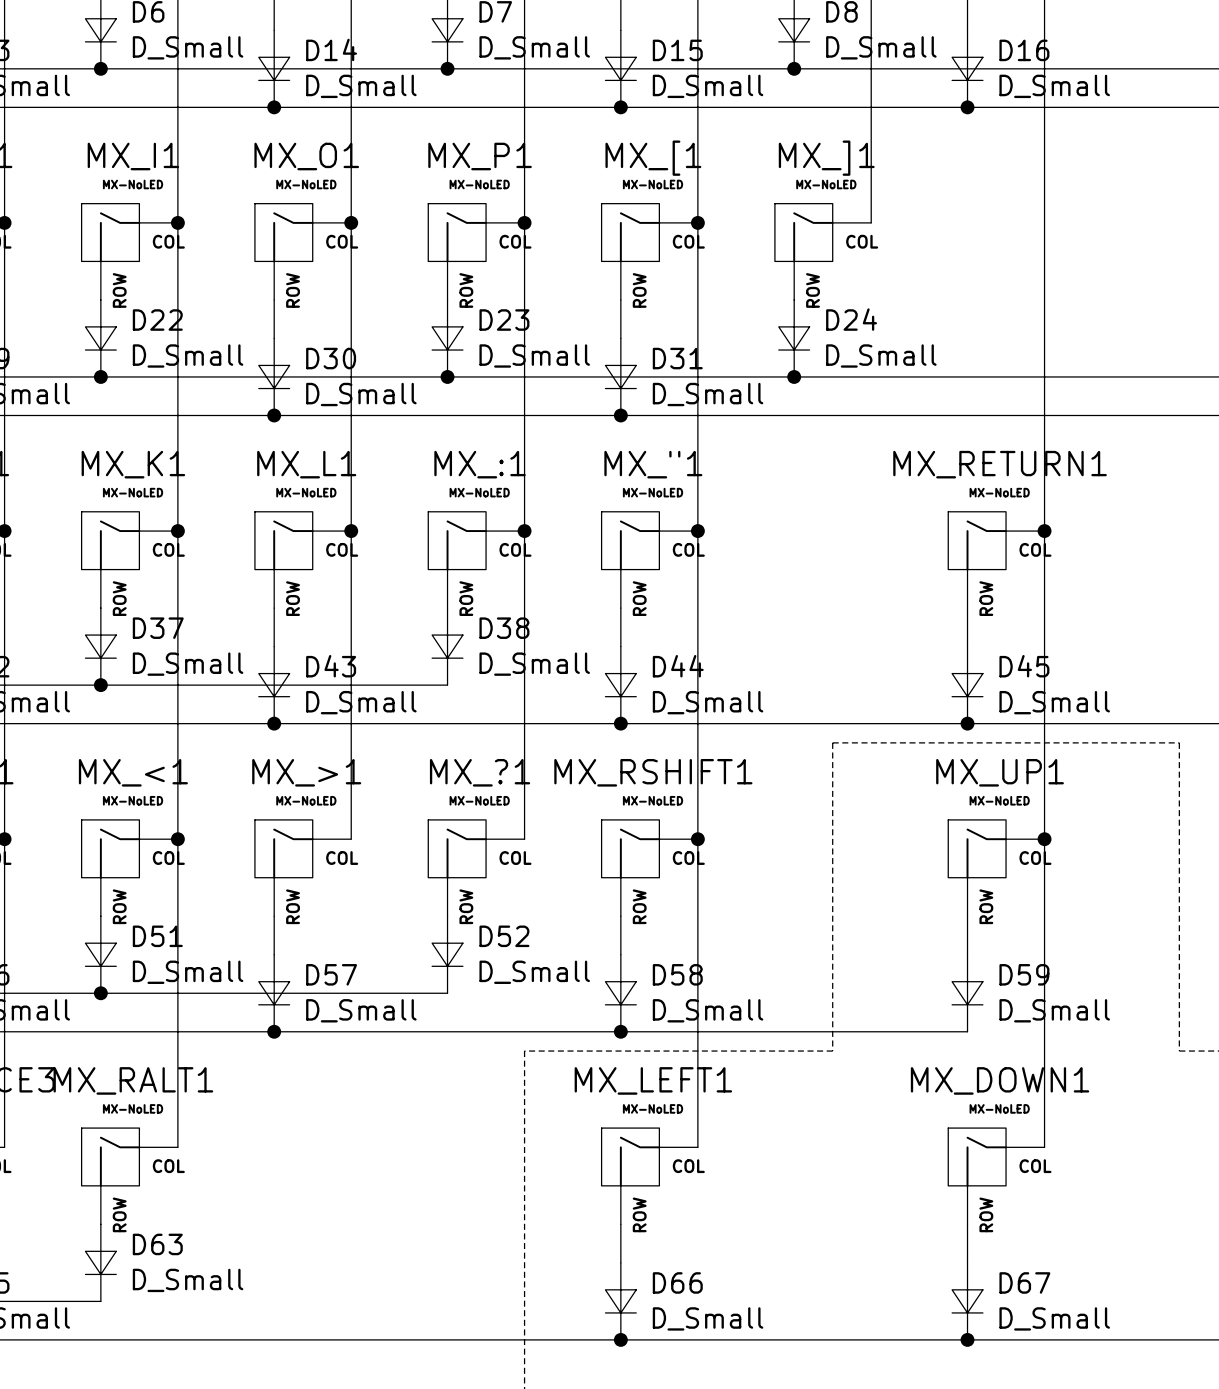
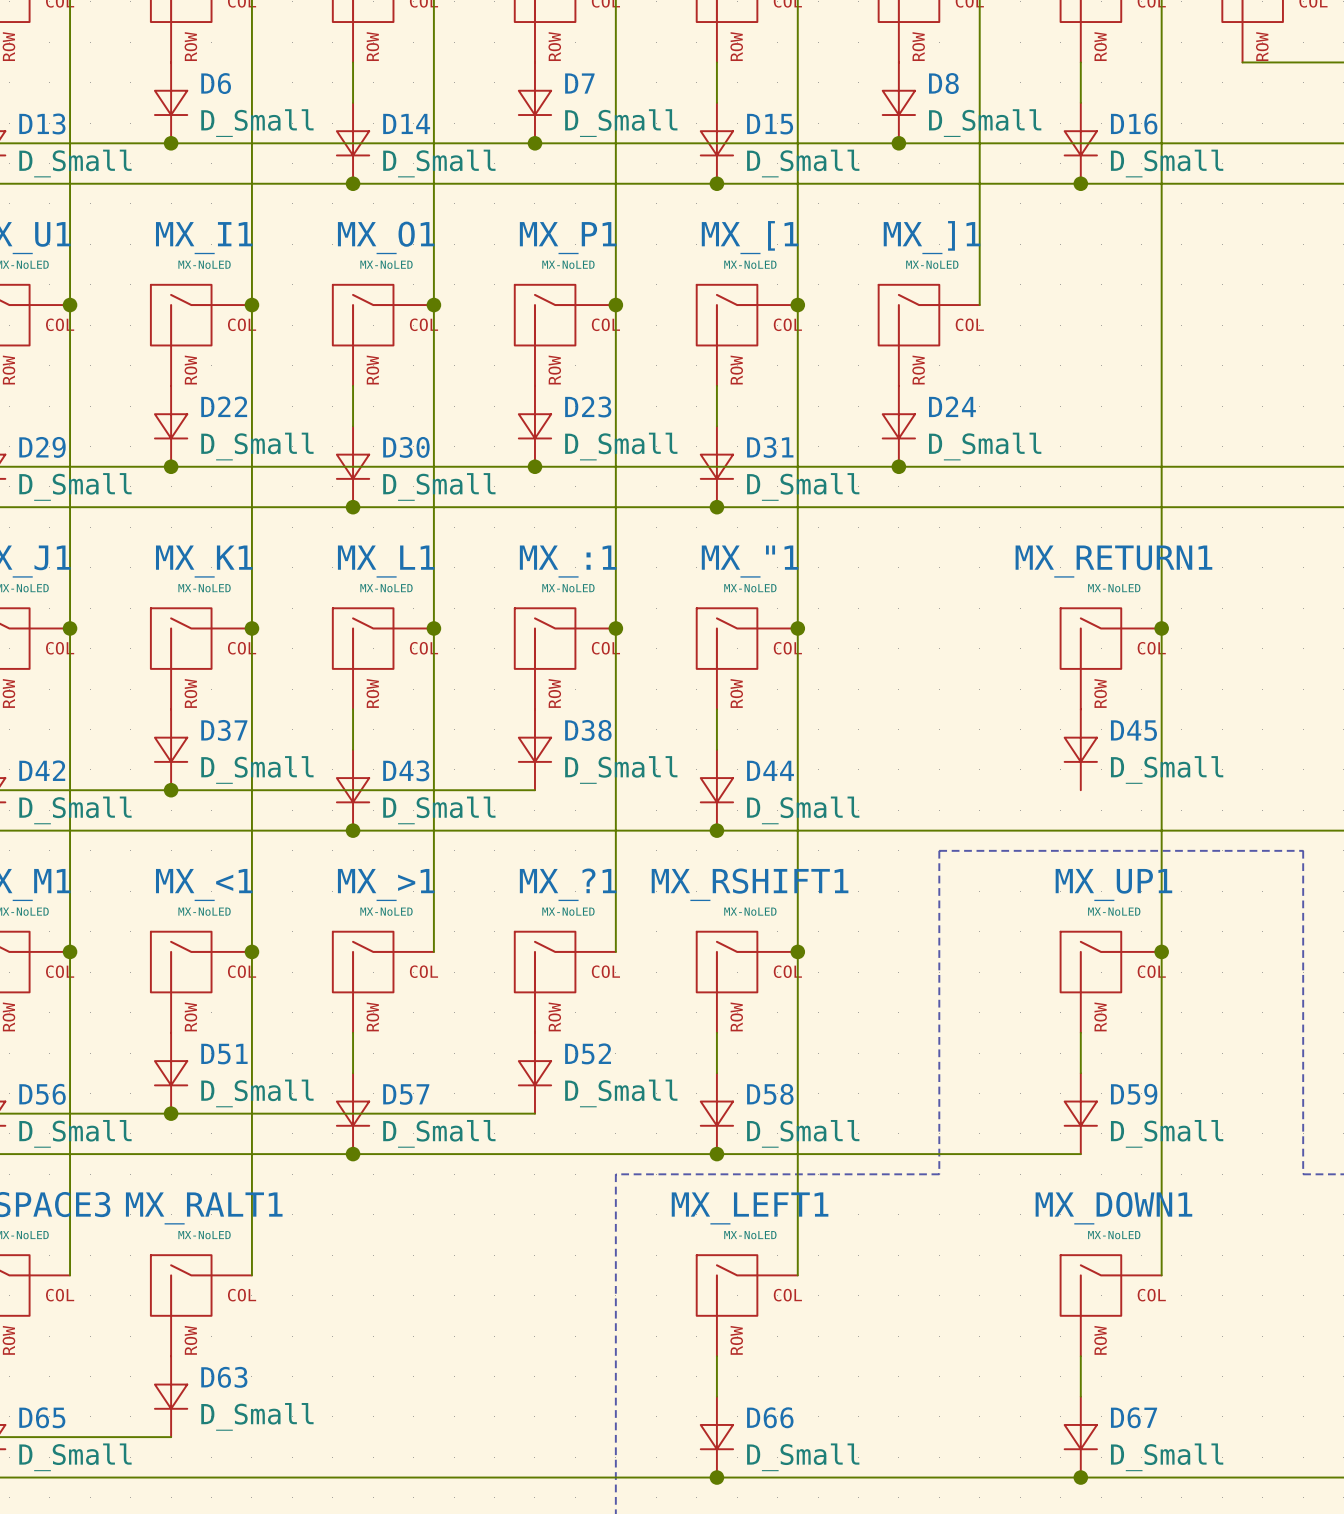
D45 position: (967, 685) -> (1080, 749)
junction: (967, 723) -> none

